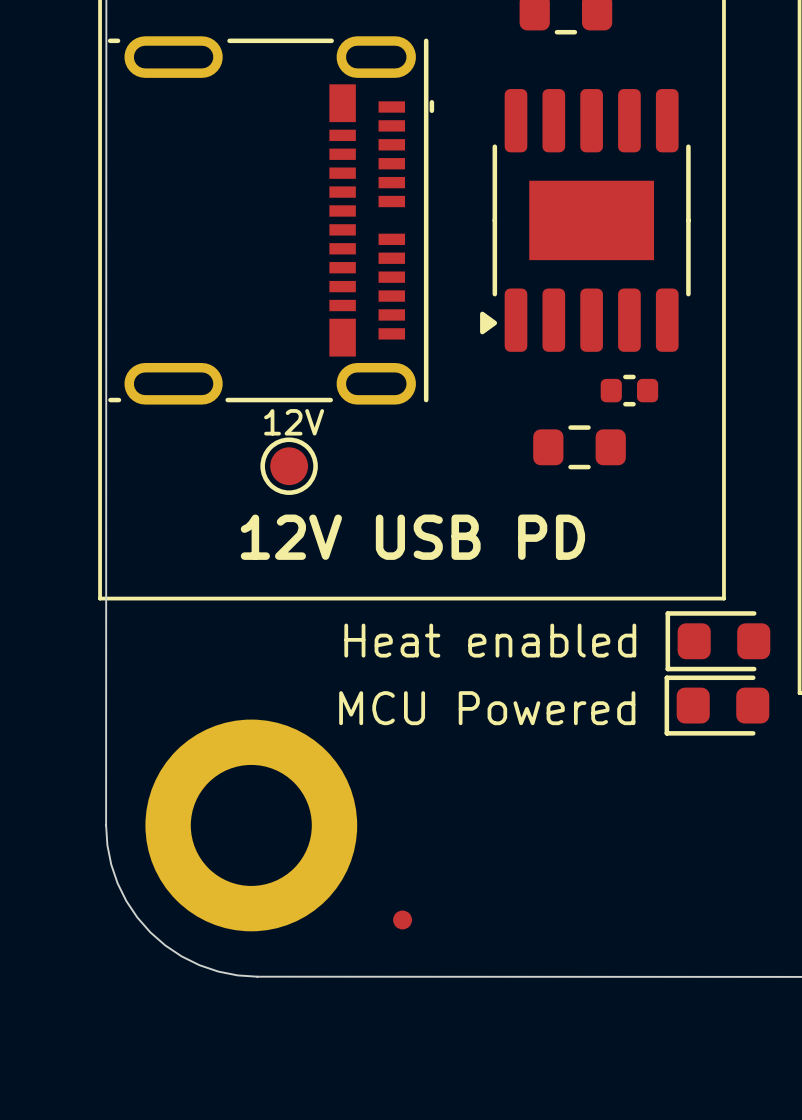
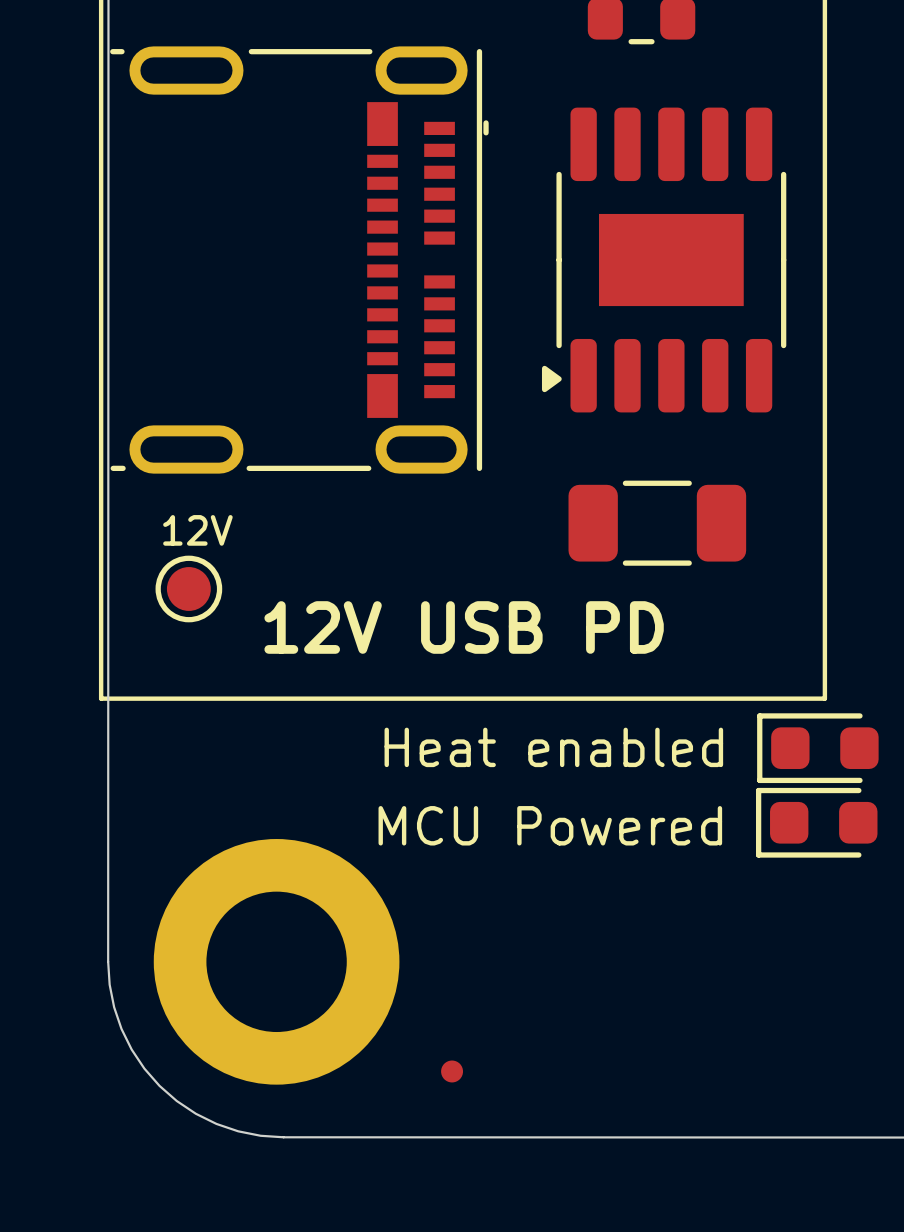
part: (629, 390) -> none
text position: 12V (294, 422) -> 12V (197, 530)
part footprint: [533, 425, 626, 470] -> [568, 480, 747, 566]
part position: (289, 466) -> (188, 588)

